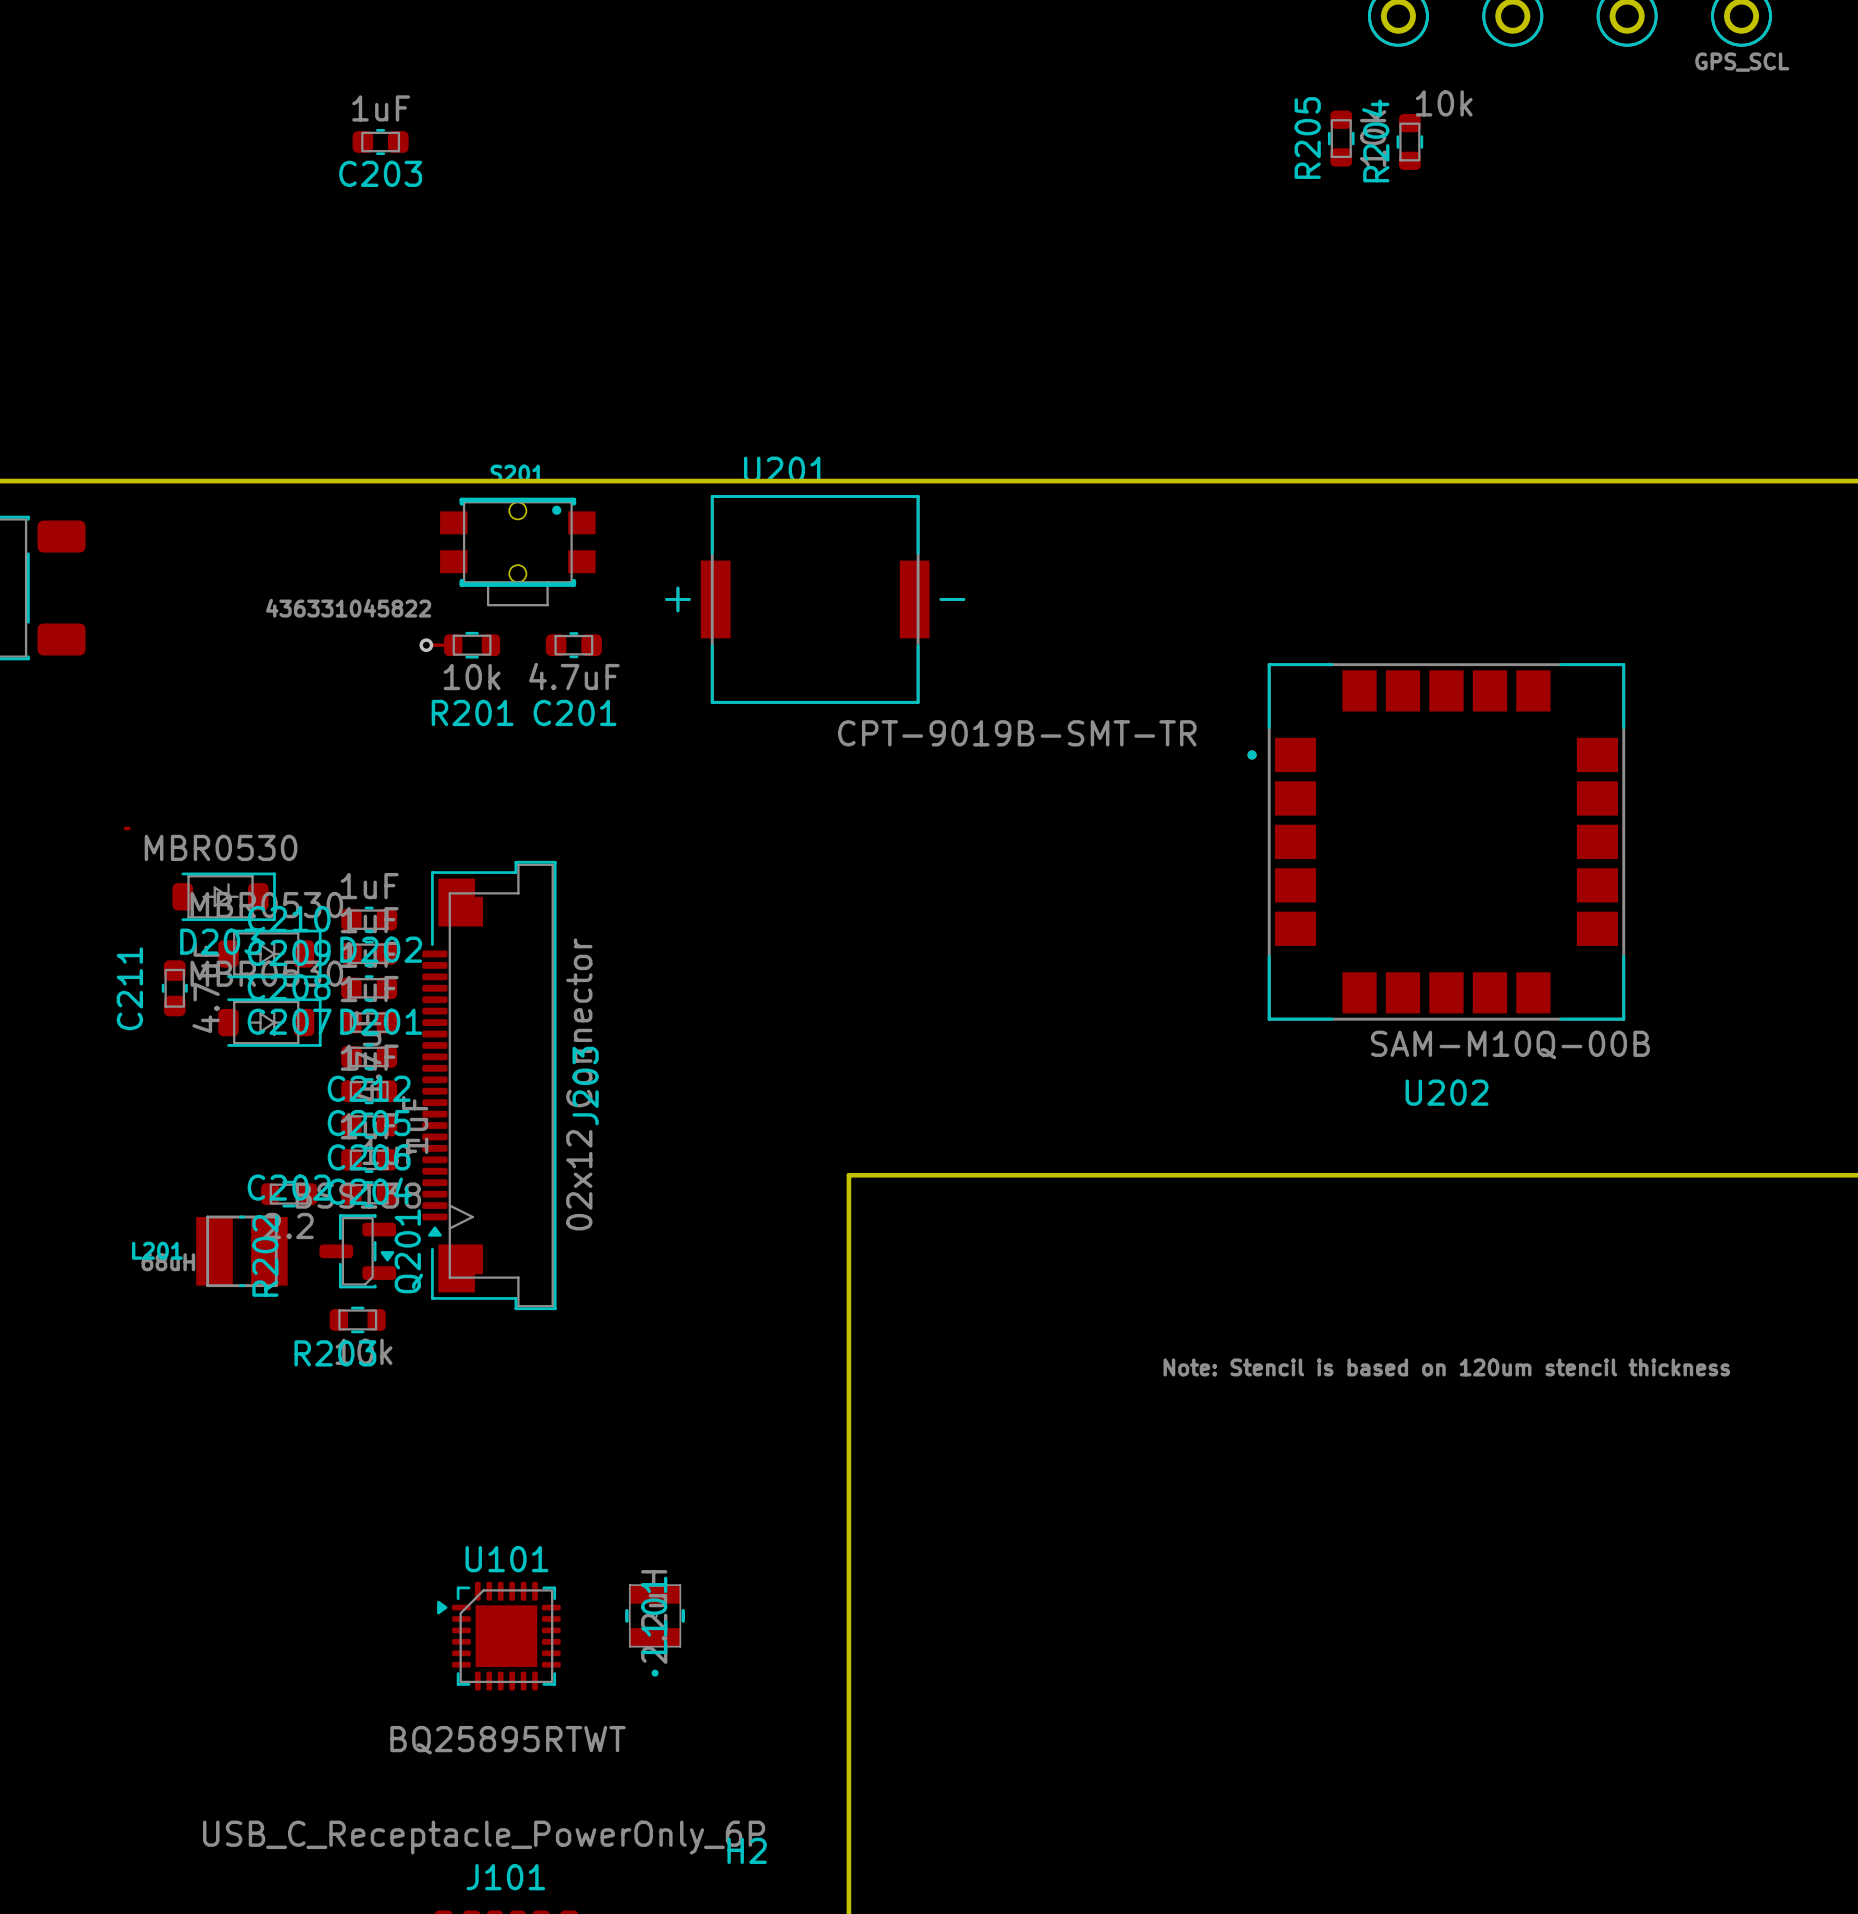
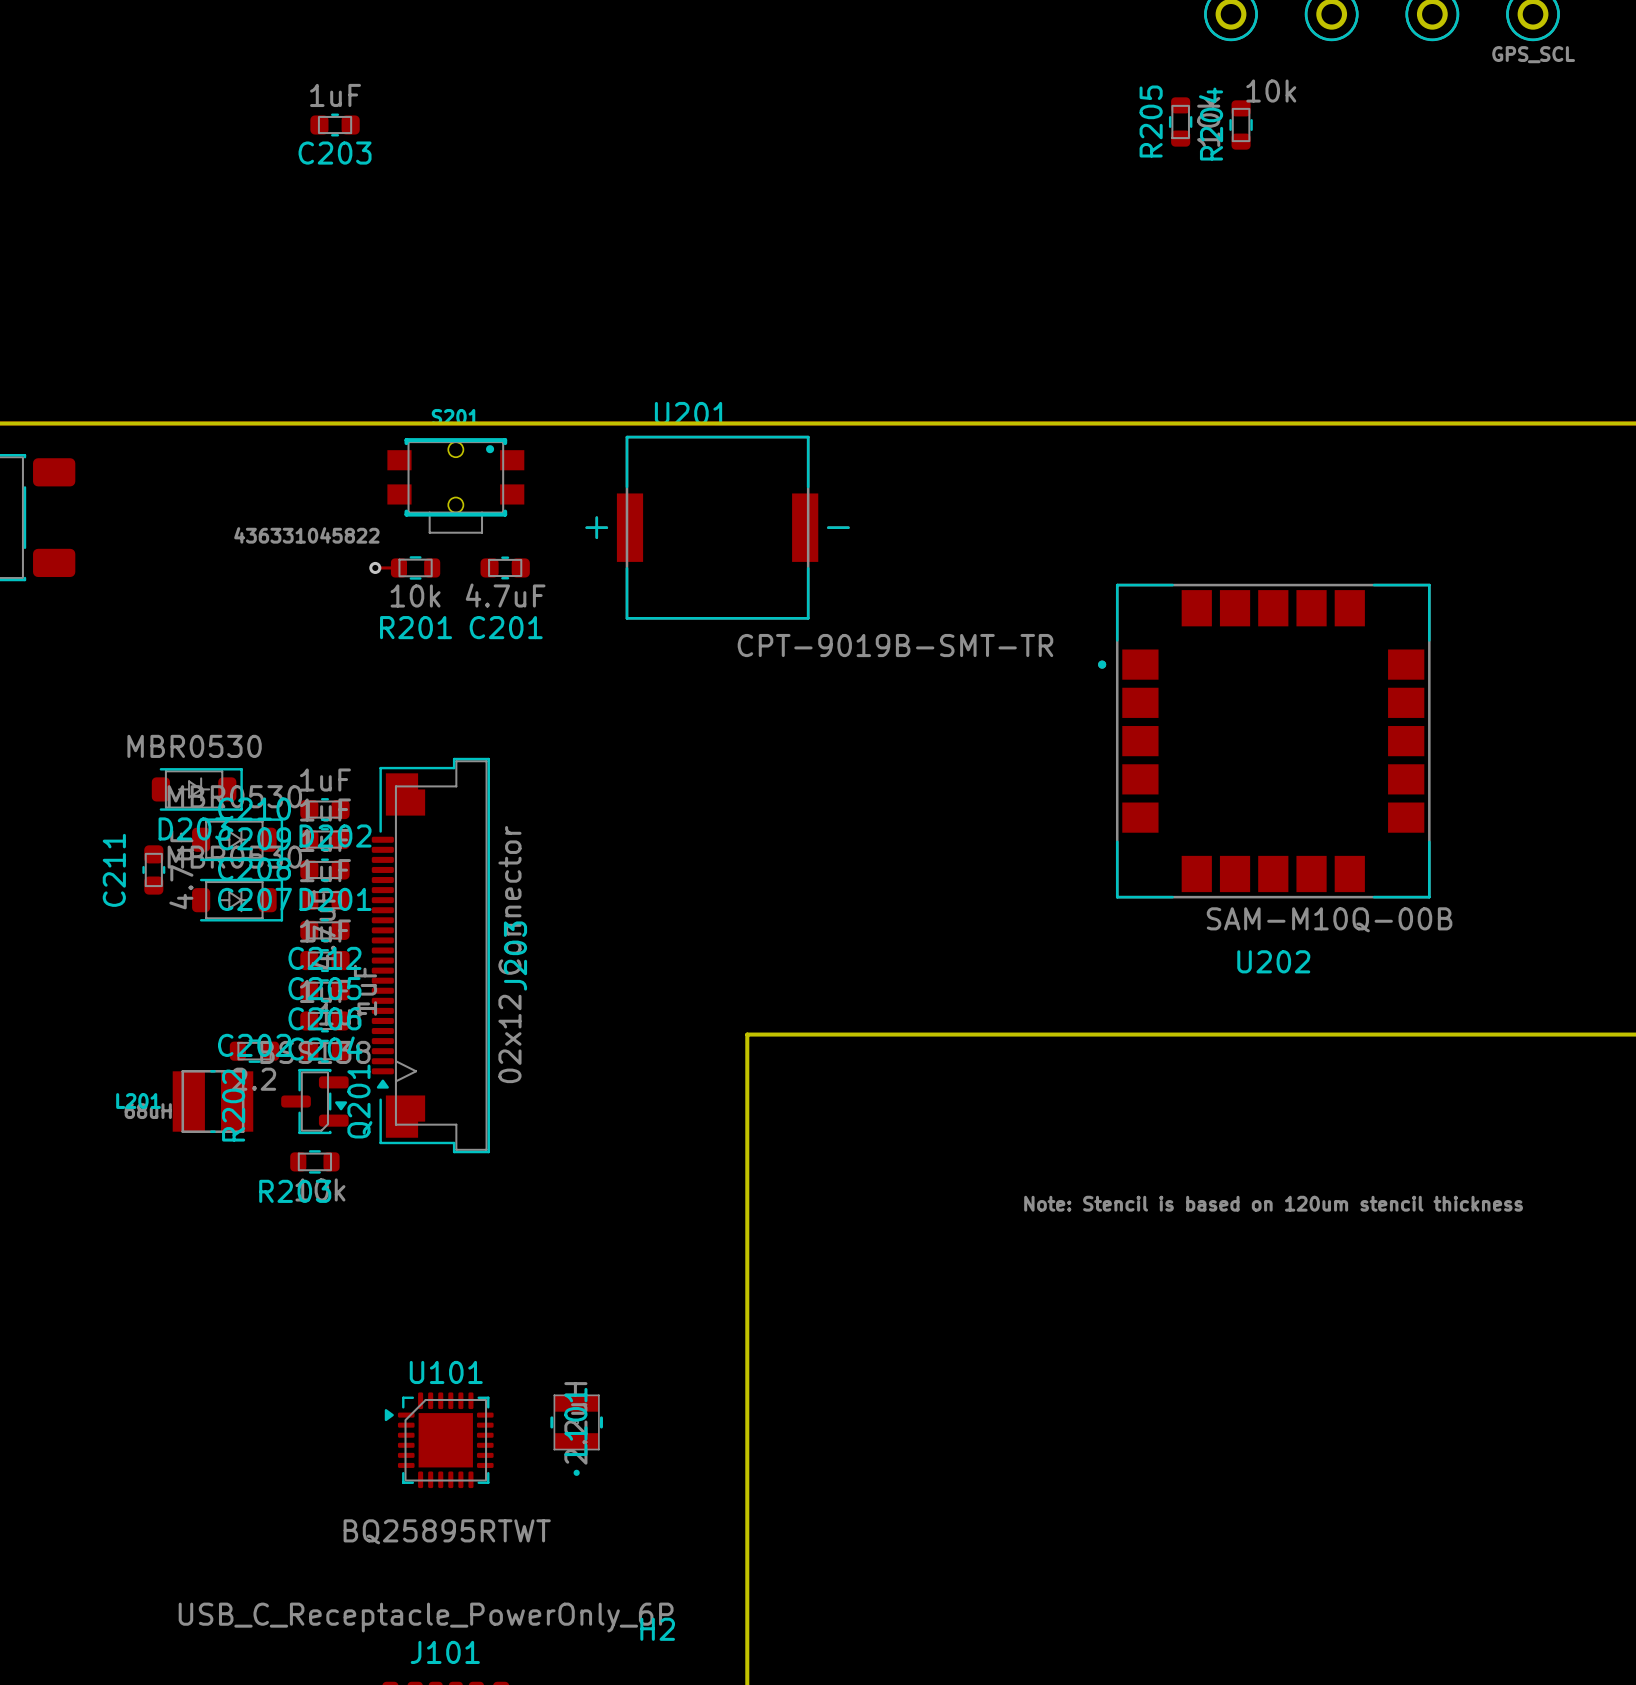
track: (125, 828) (129, 828) -> none

